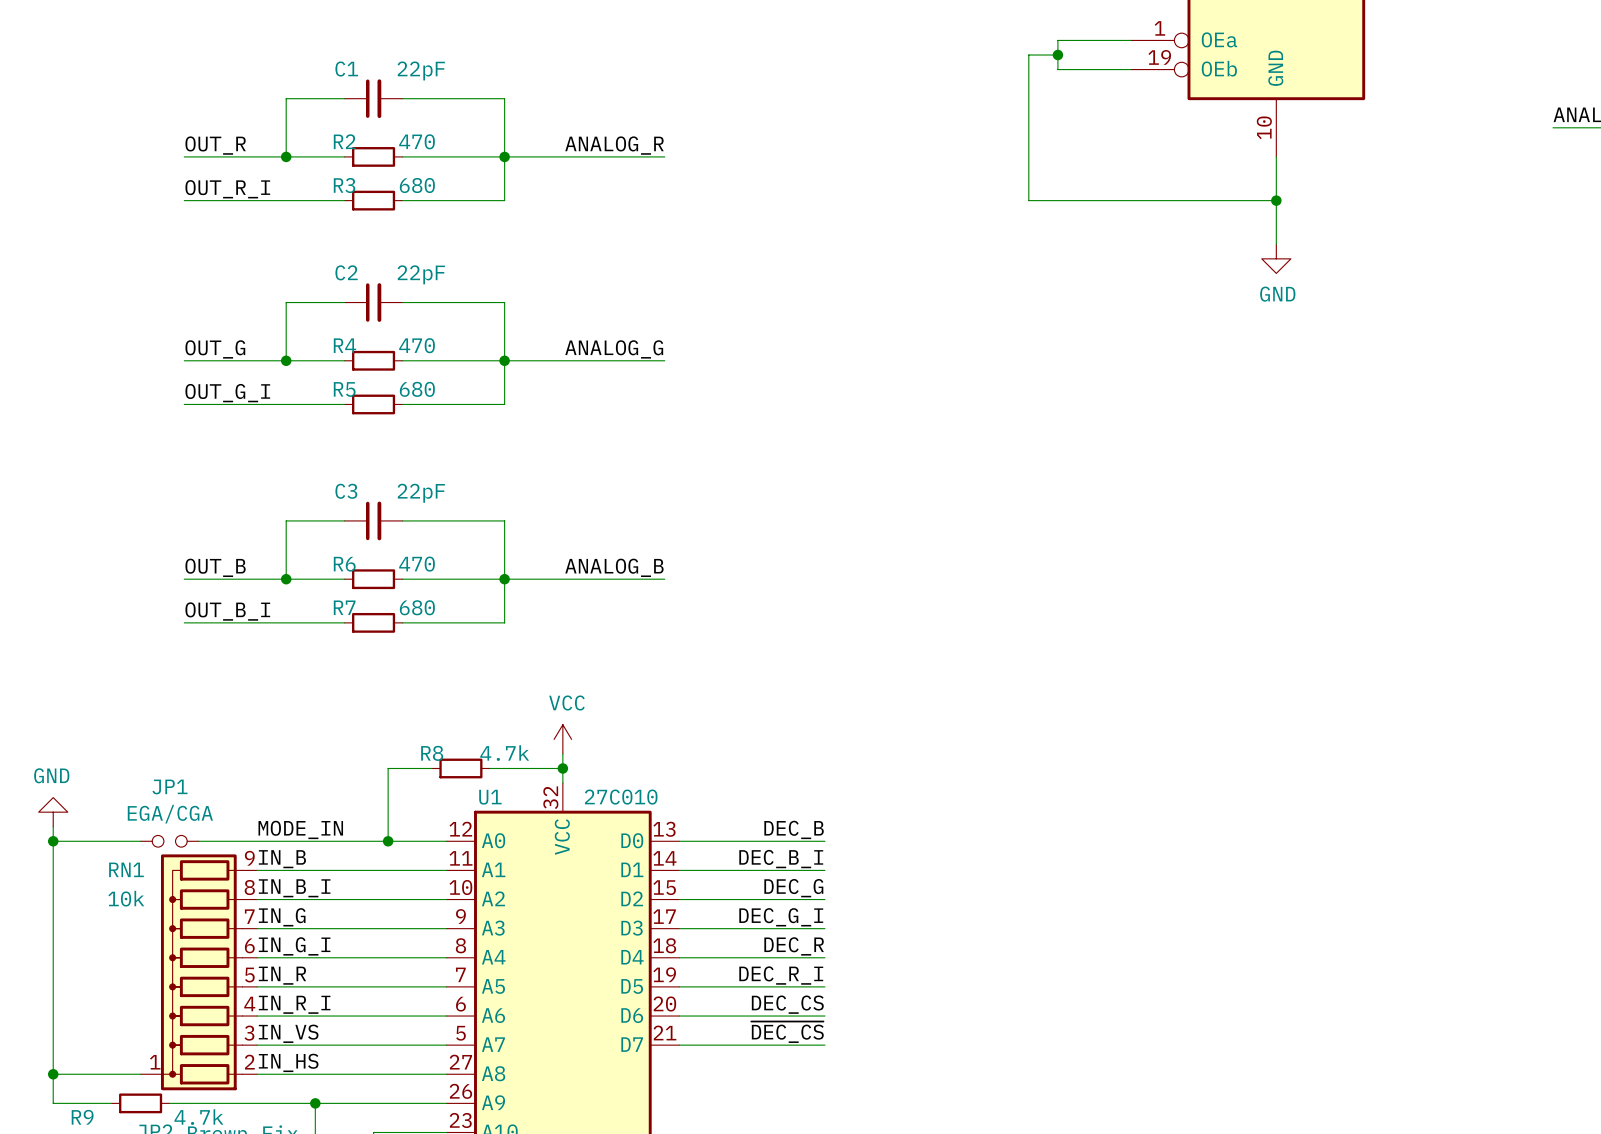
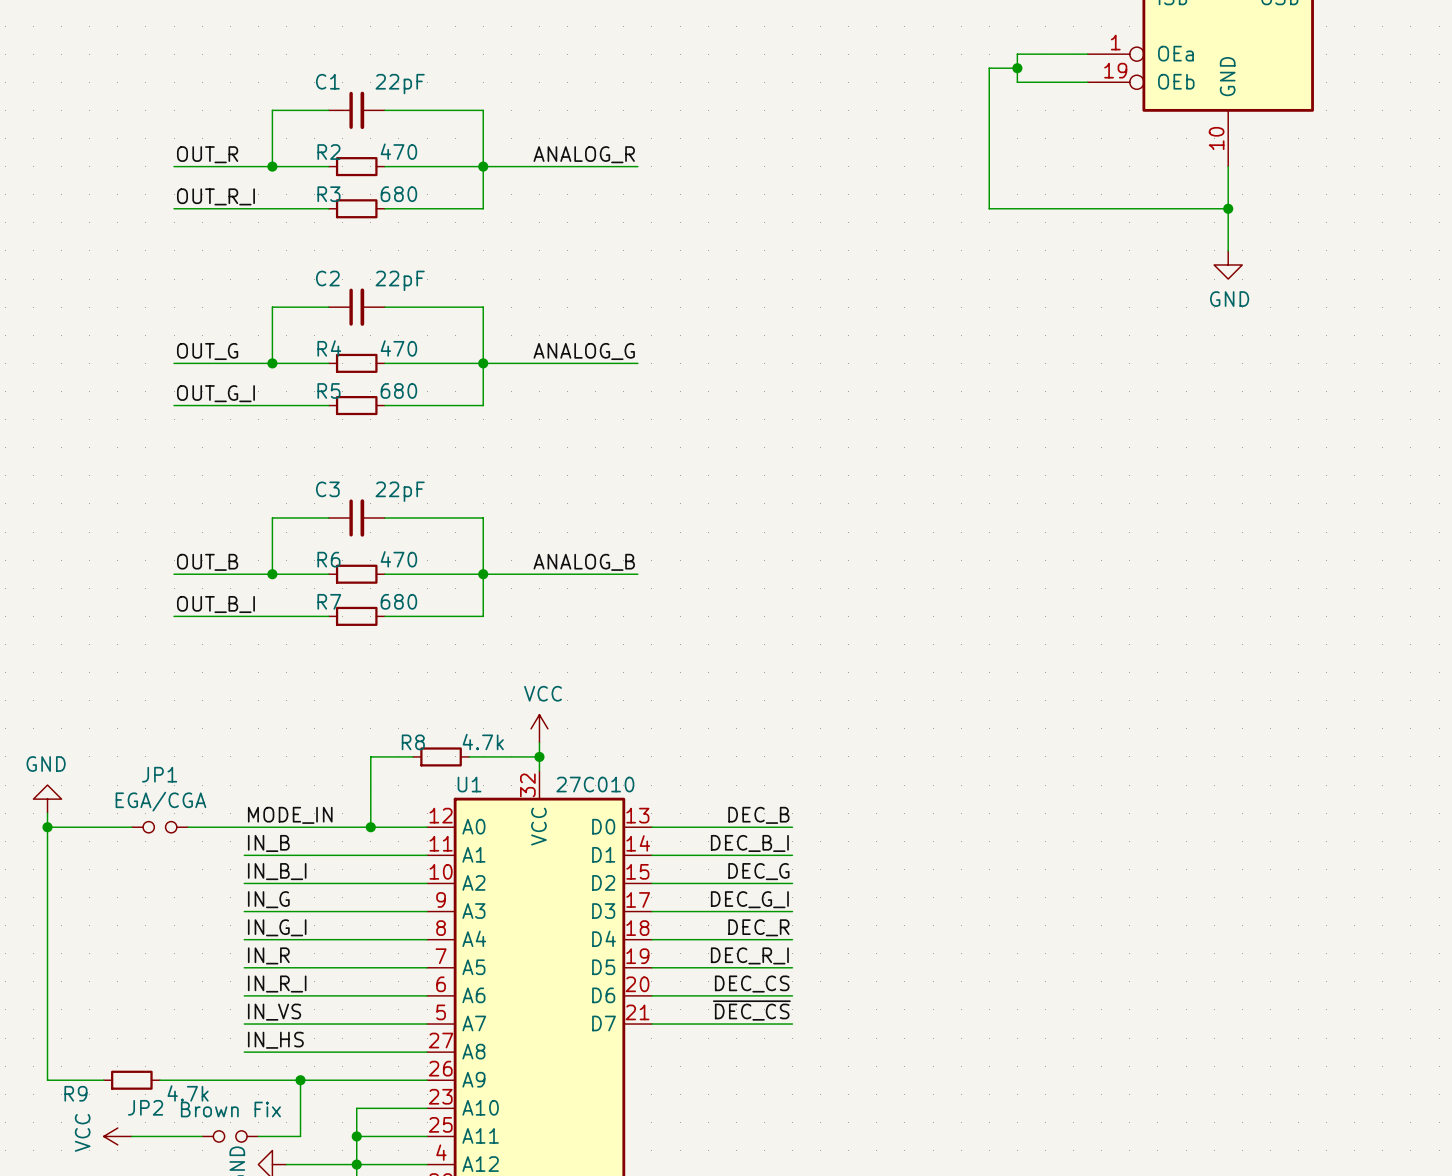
RN1: 10k (198, 972) -> none
wire: (53, 1074) (140, 1074) -> none
junction: (53, 1074) -> none

